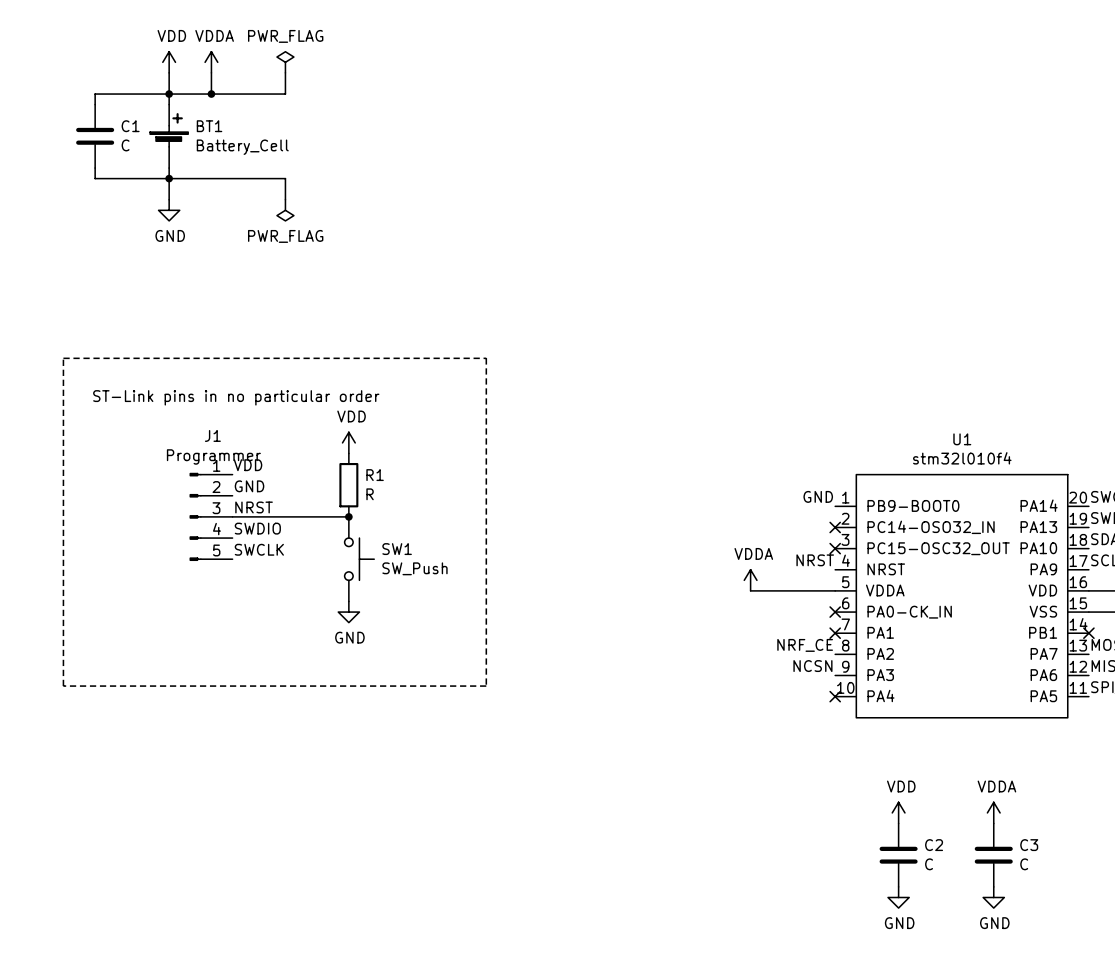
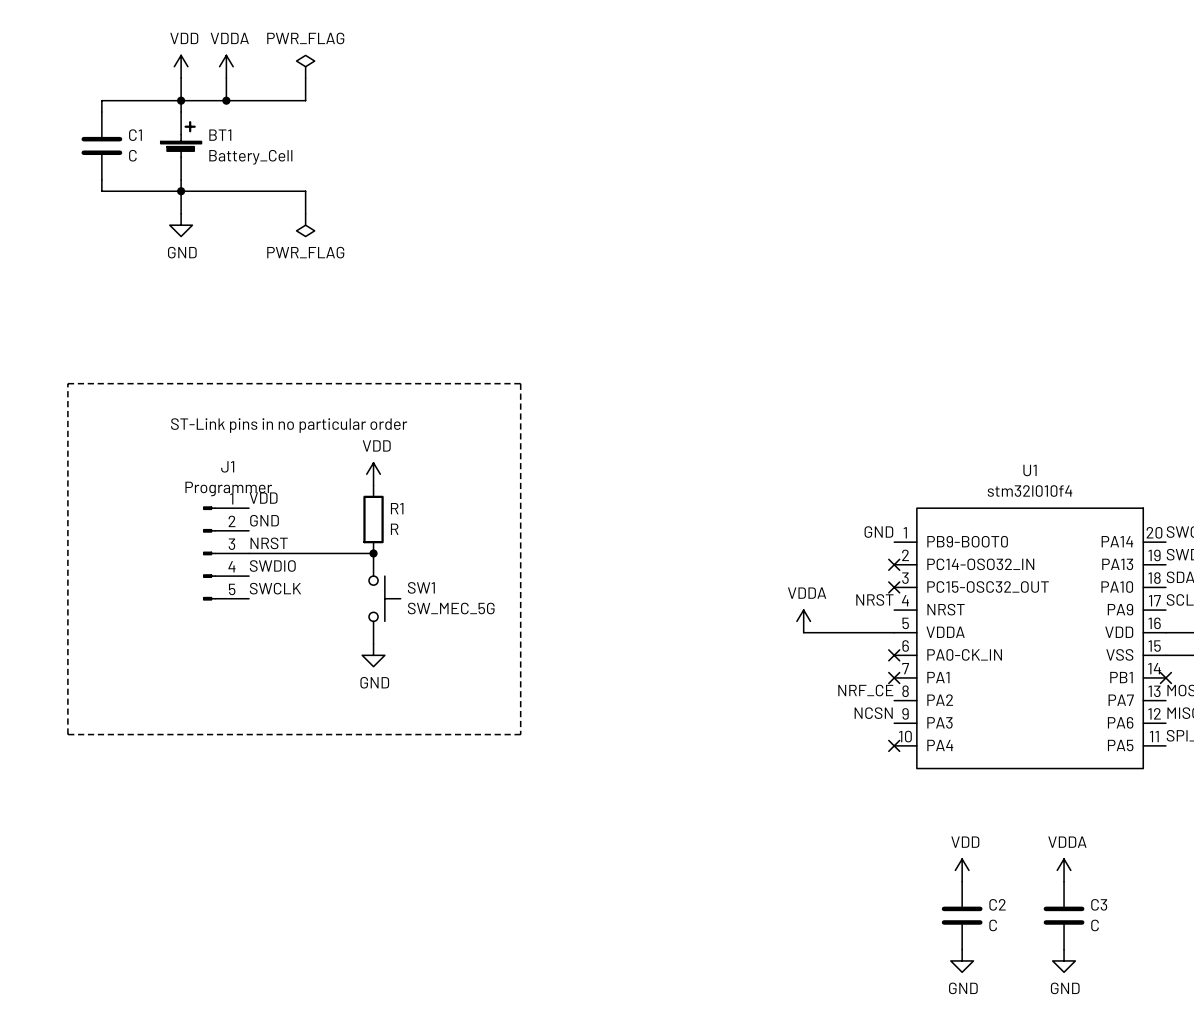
SW1 value: SW_Push (414, 568) -> SW_MEC_5G (451, 608)

